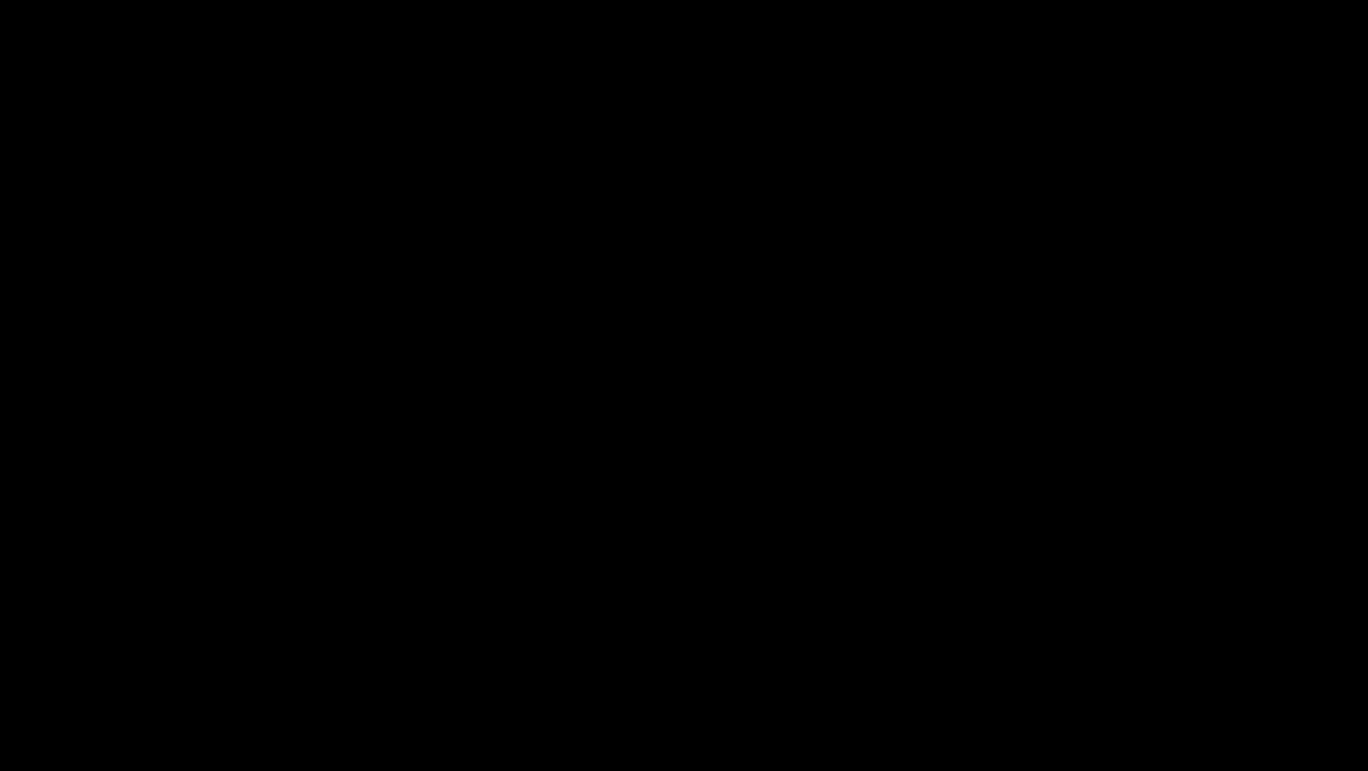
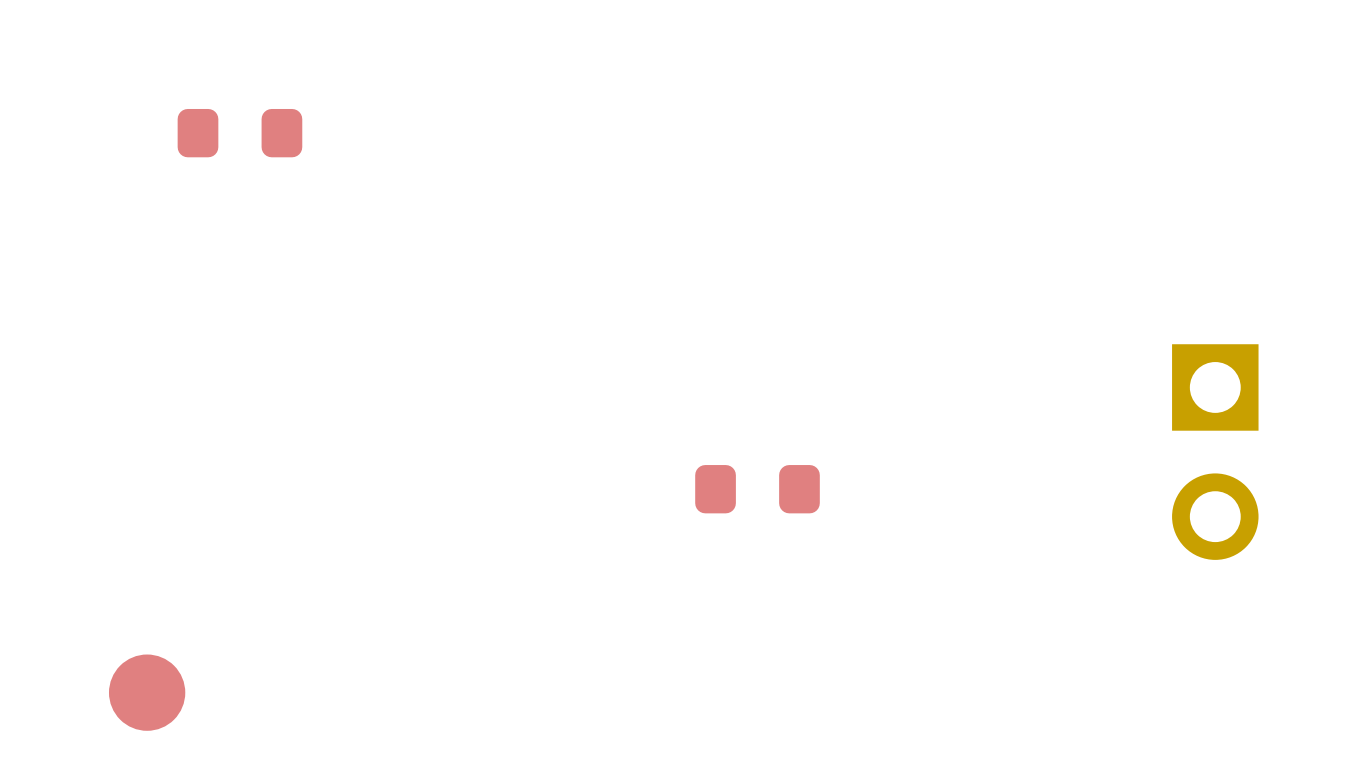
part: none -> (239, 133)
part: none -> (1215, 452)
part: none -> (757, 489)
part: none -> (147, 692)

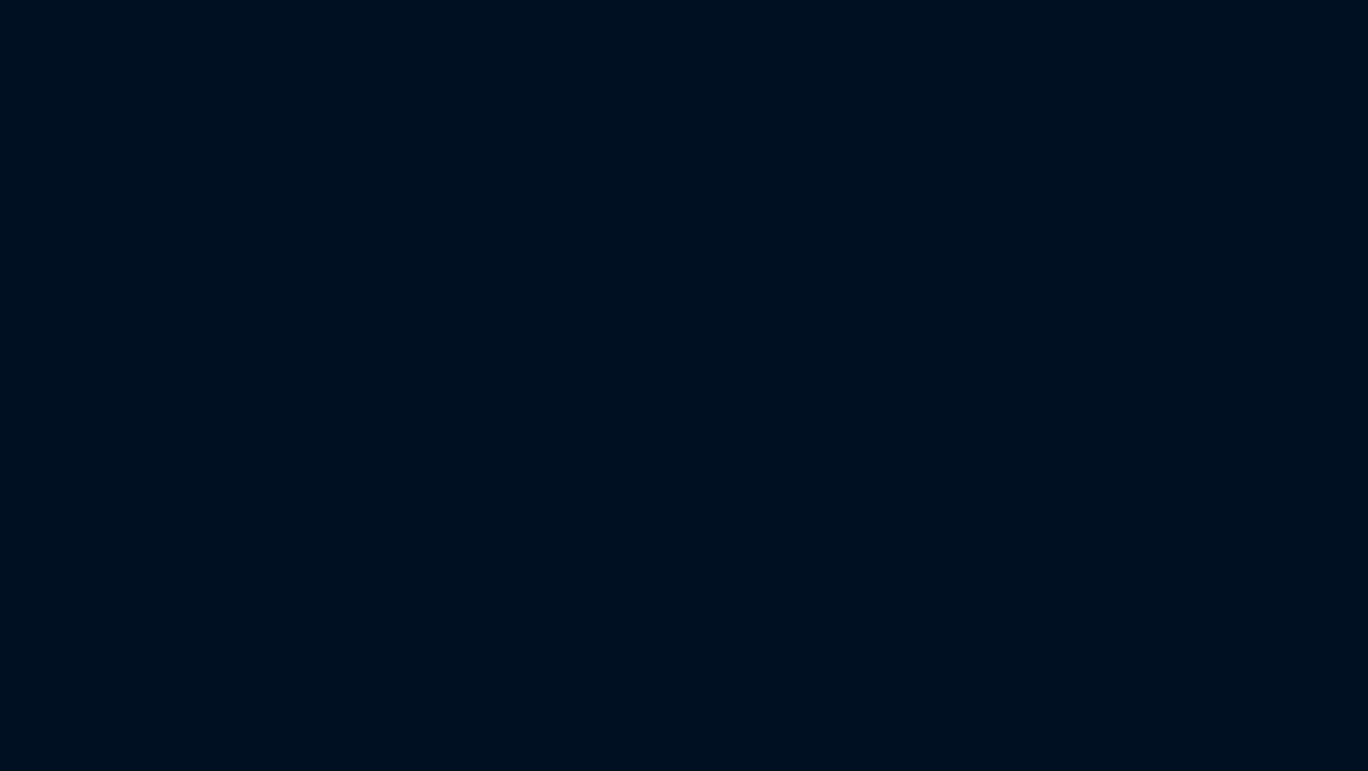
part: (239, 133) -> none
part: (1215, 452) -> none
part: (757, 489) -> none
part: (147, 692) -> none

